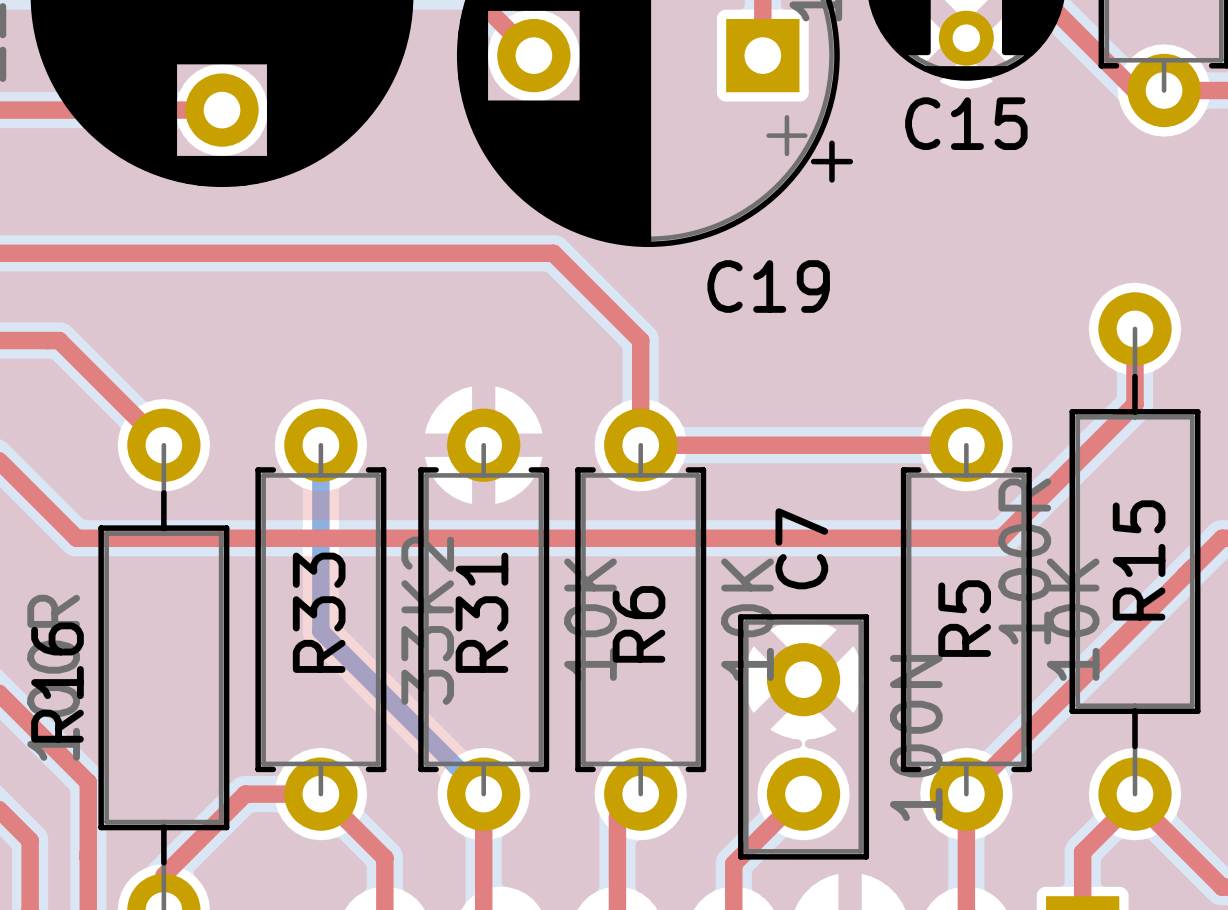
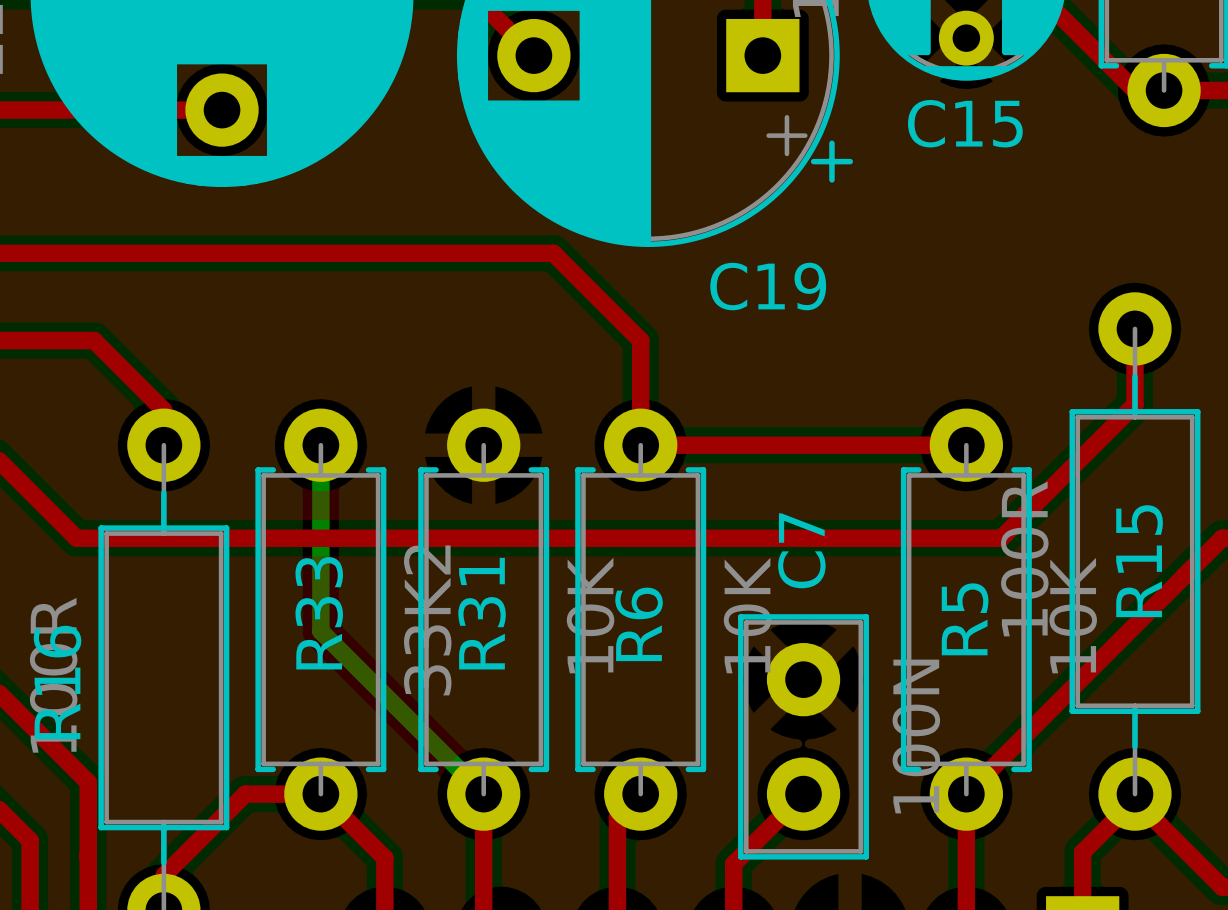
top track: (59, 340) (163, 445) -> (59, 340) (94, 340) (163, 410)

